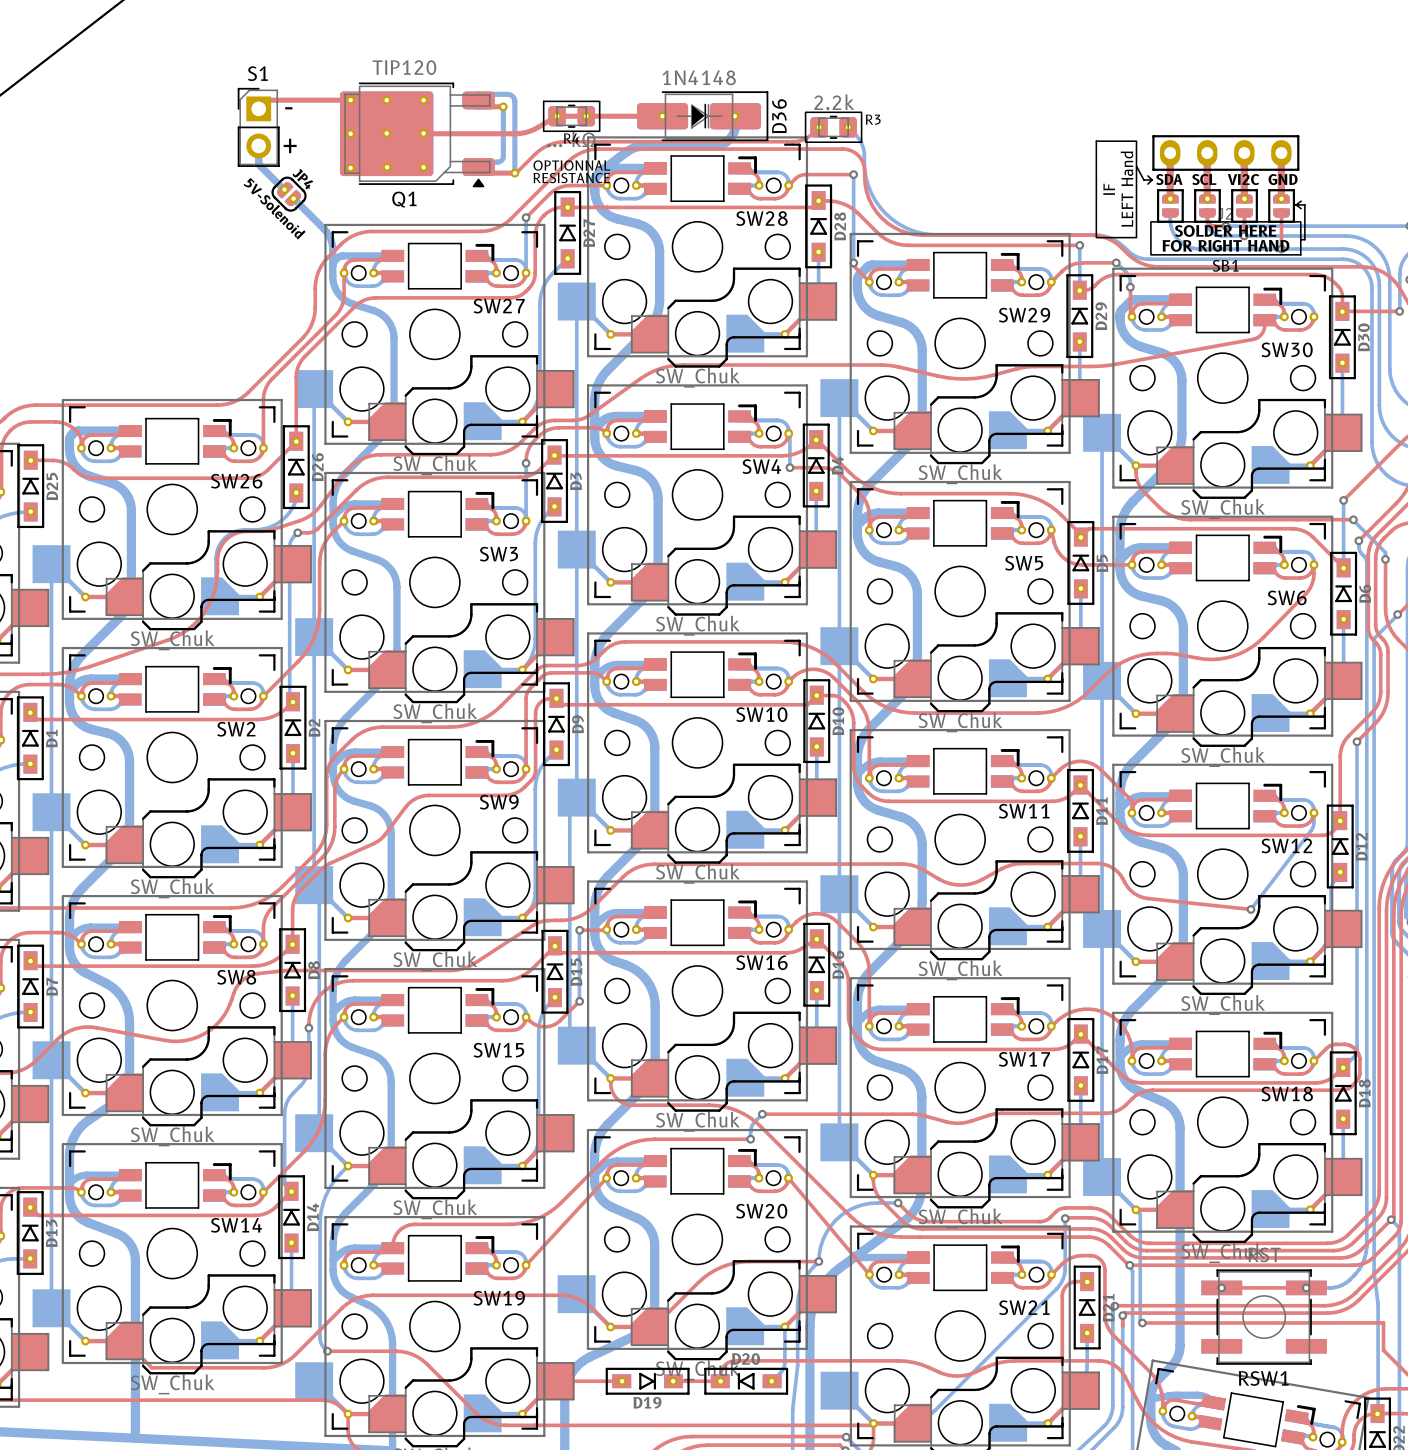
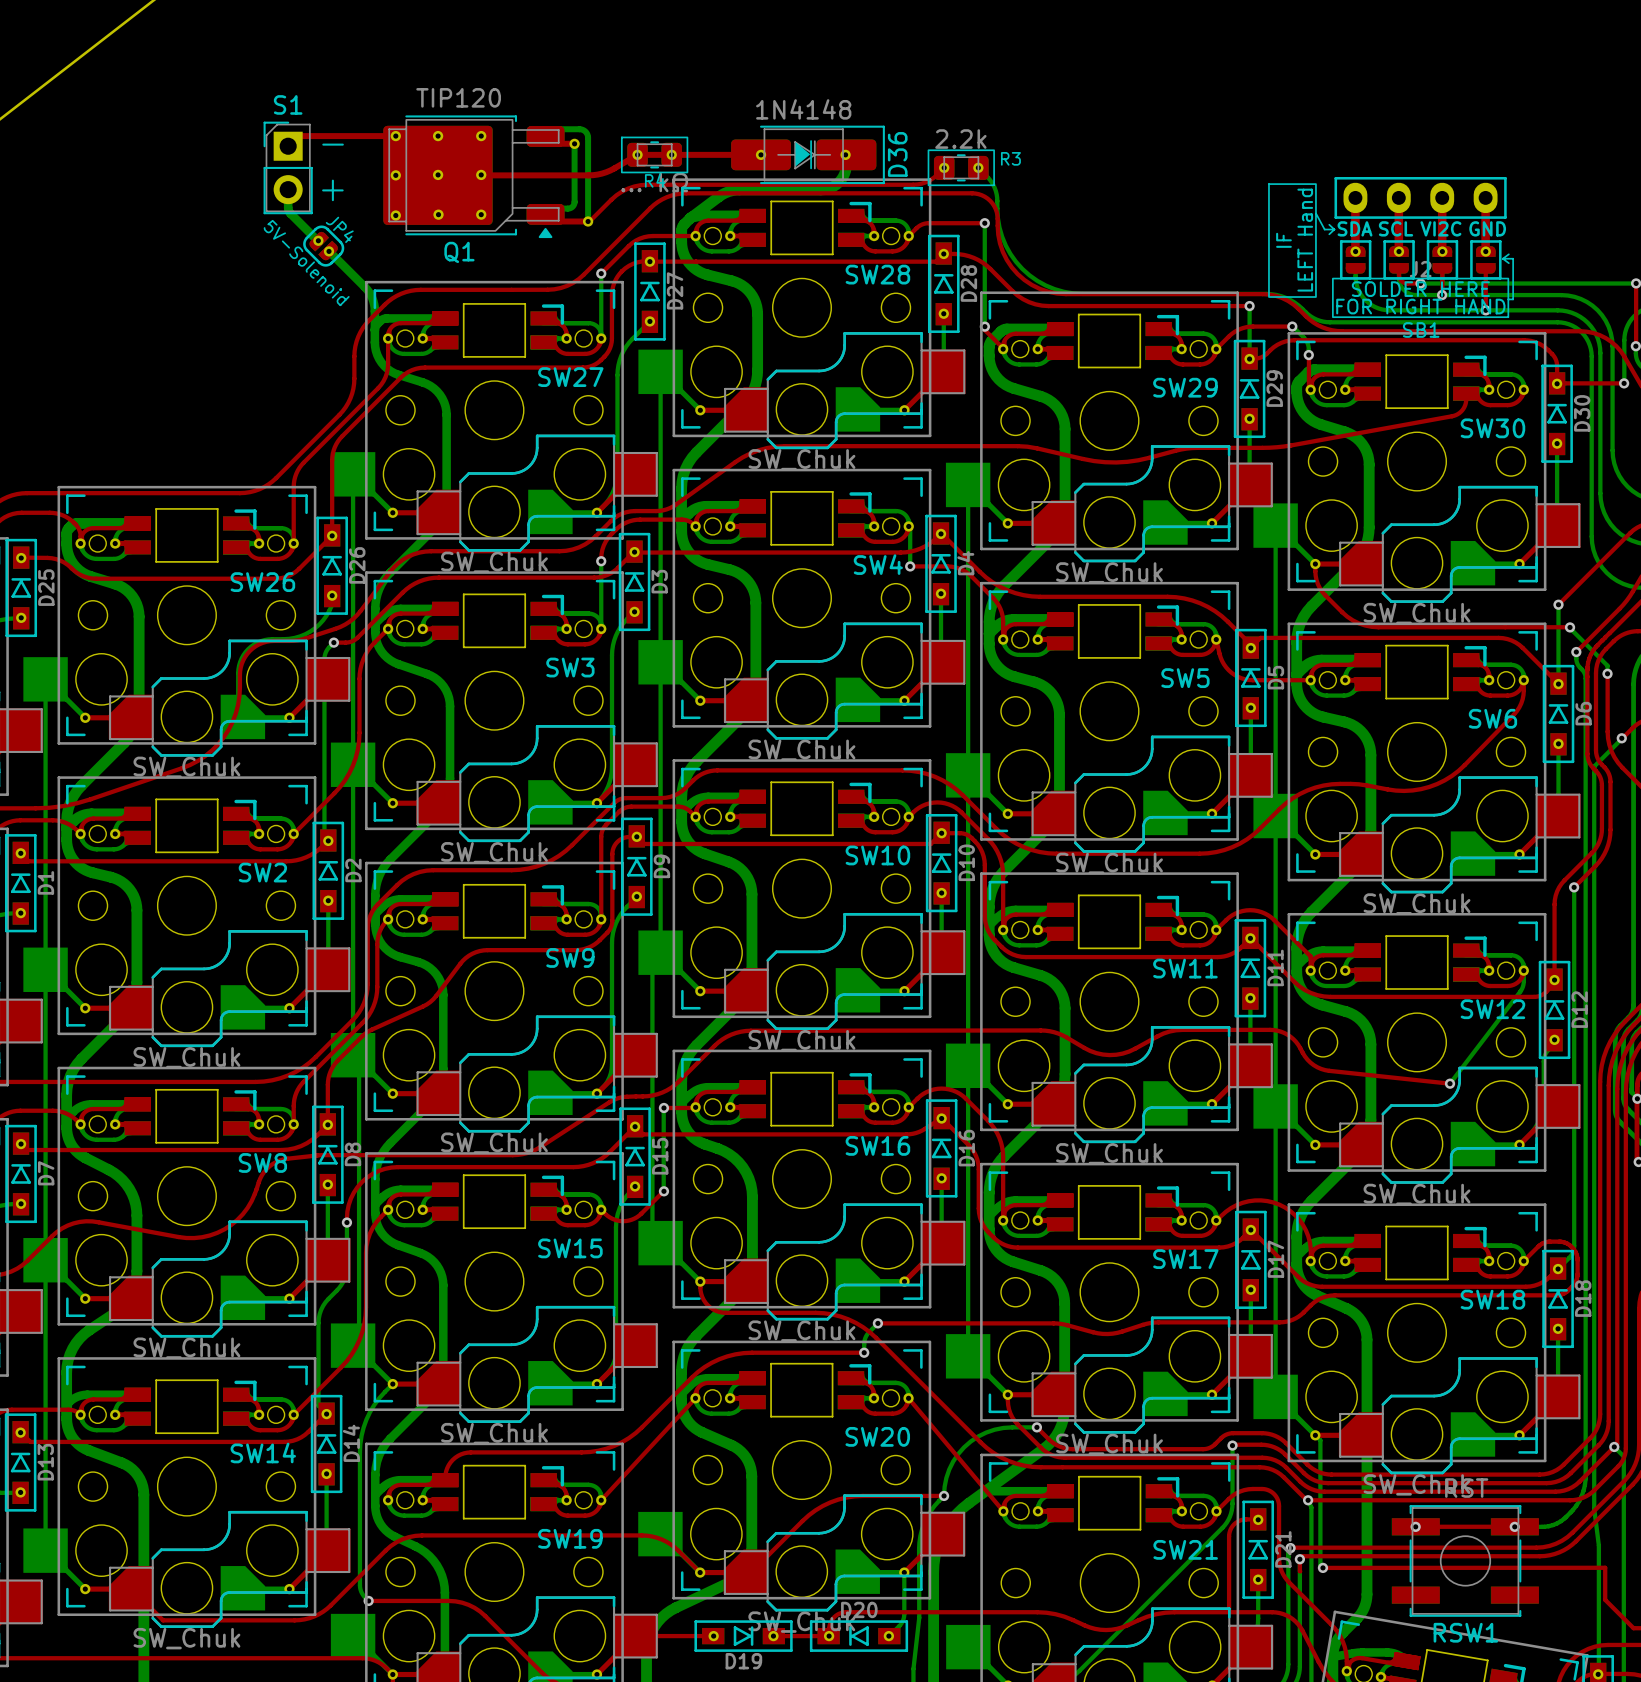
R4 text: OPTIONNAL (571, 165) -> none
R4 text: RESISTANCE (571, 178) -> none

